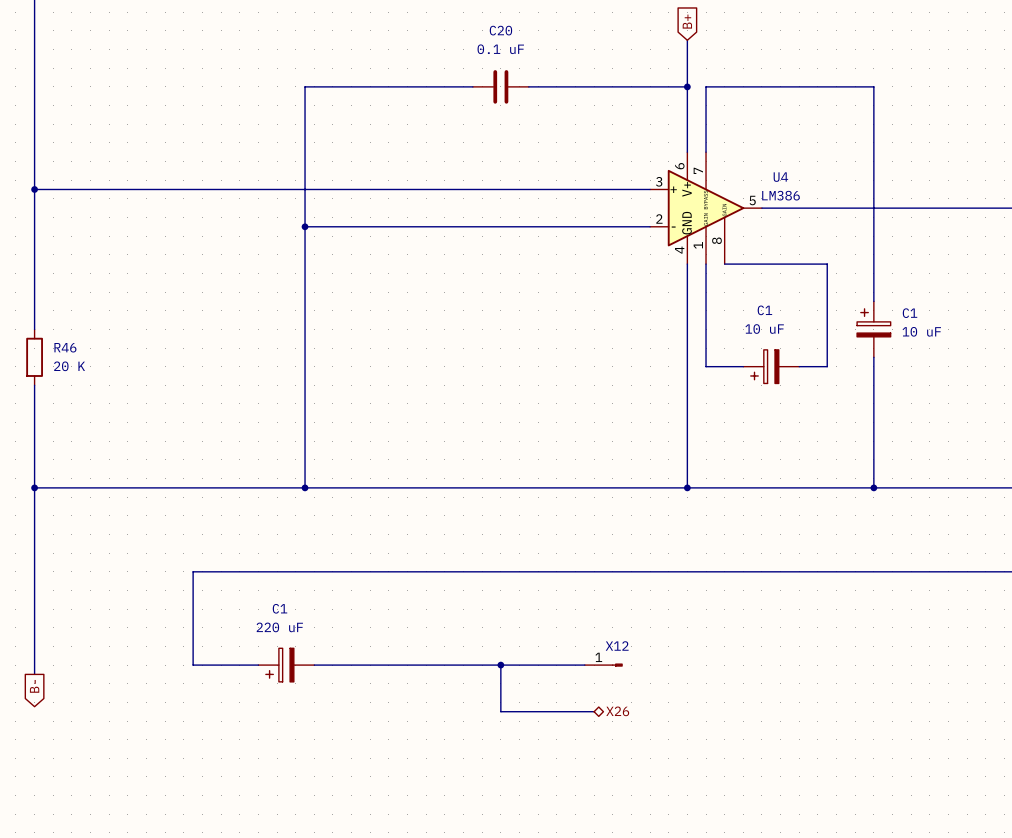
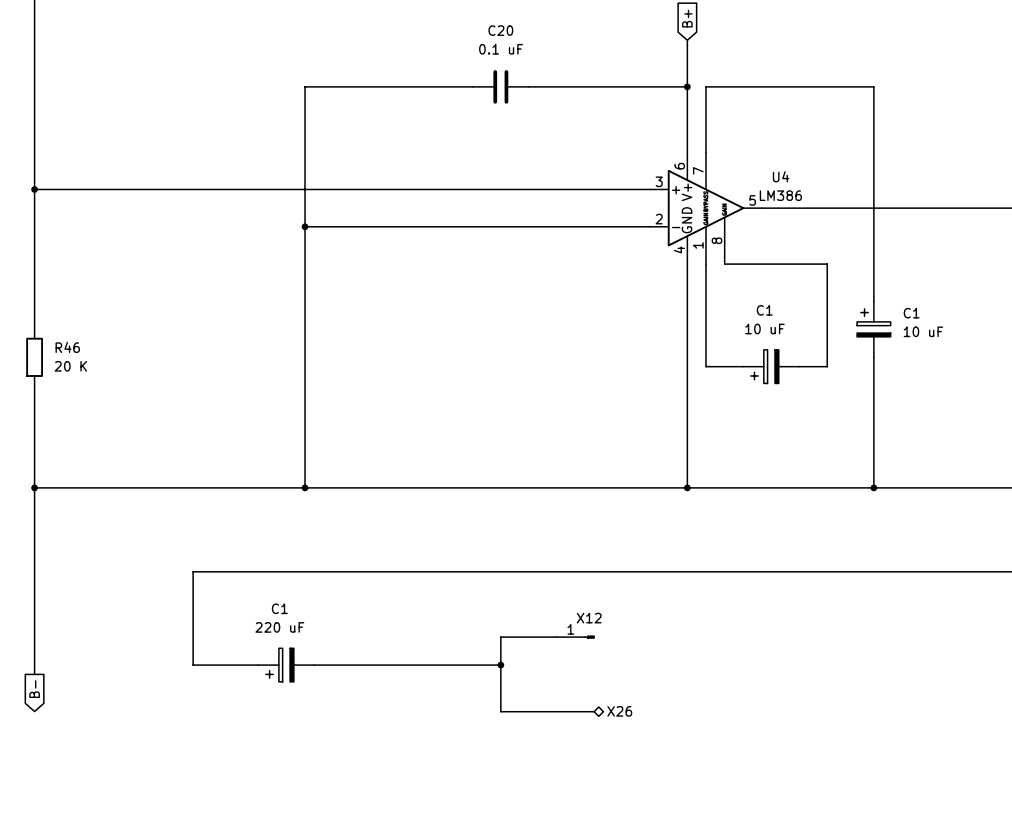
wire: (500, 665) (584, 665) -> (500, 665) (500, 637) (556, 637)
X12 position: (603, 665) -> (575, 637)

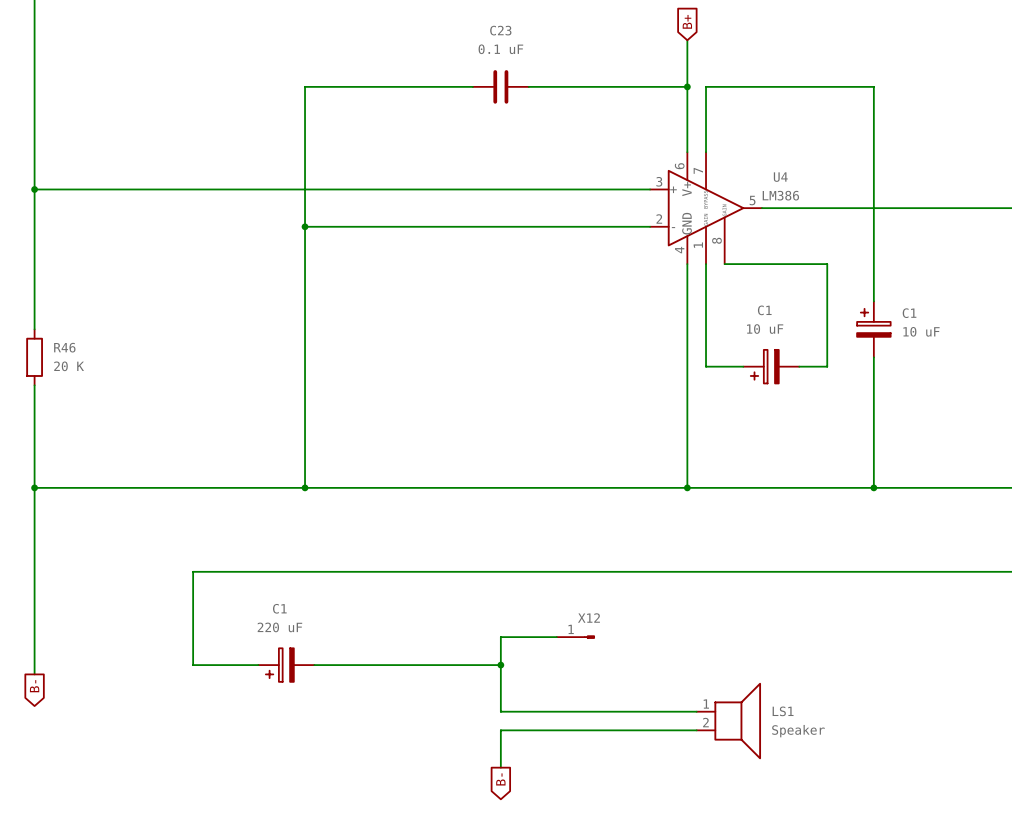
C20 name: C20 (500, 30) -> C23 (500, 30)
wire: none -> (594, 711) (696, 711)
hierarchical label: X26 (619, 711) -> none
LS1: none -> Speaker (728, 721)
wire: none -> (696, 730) (500, 730) (500, 767)
global label: none -> B- (500, 779)

